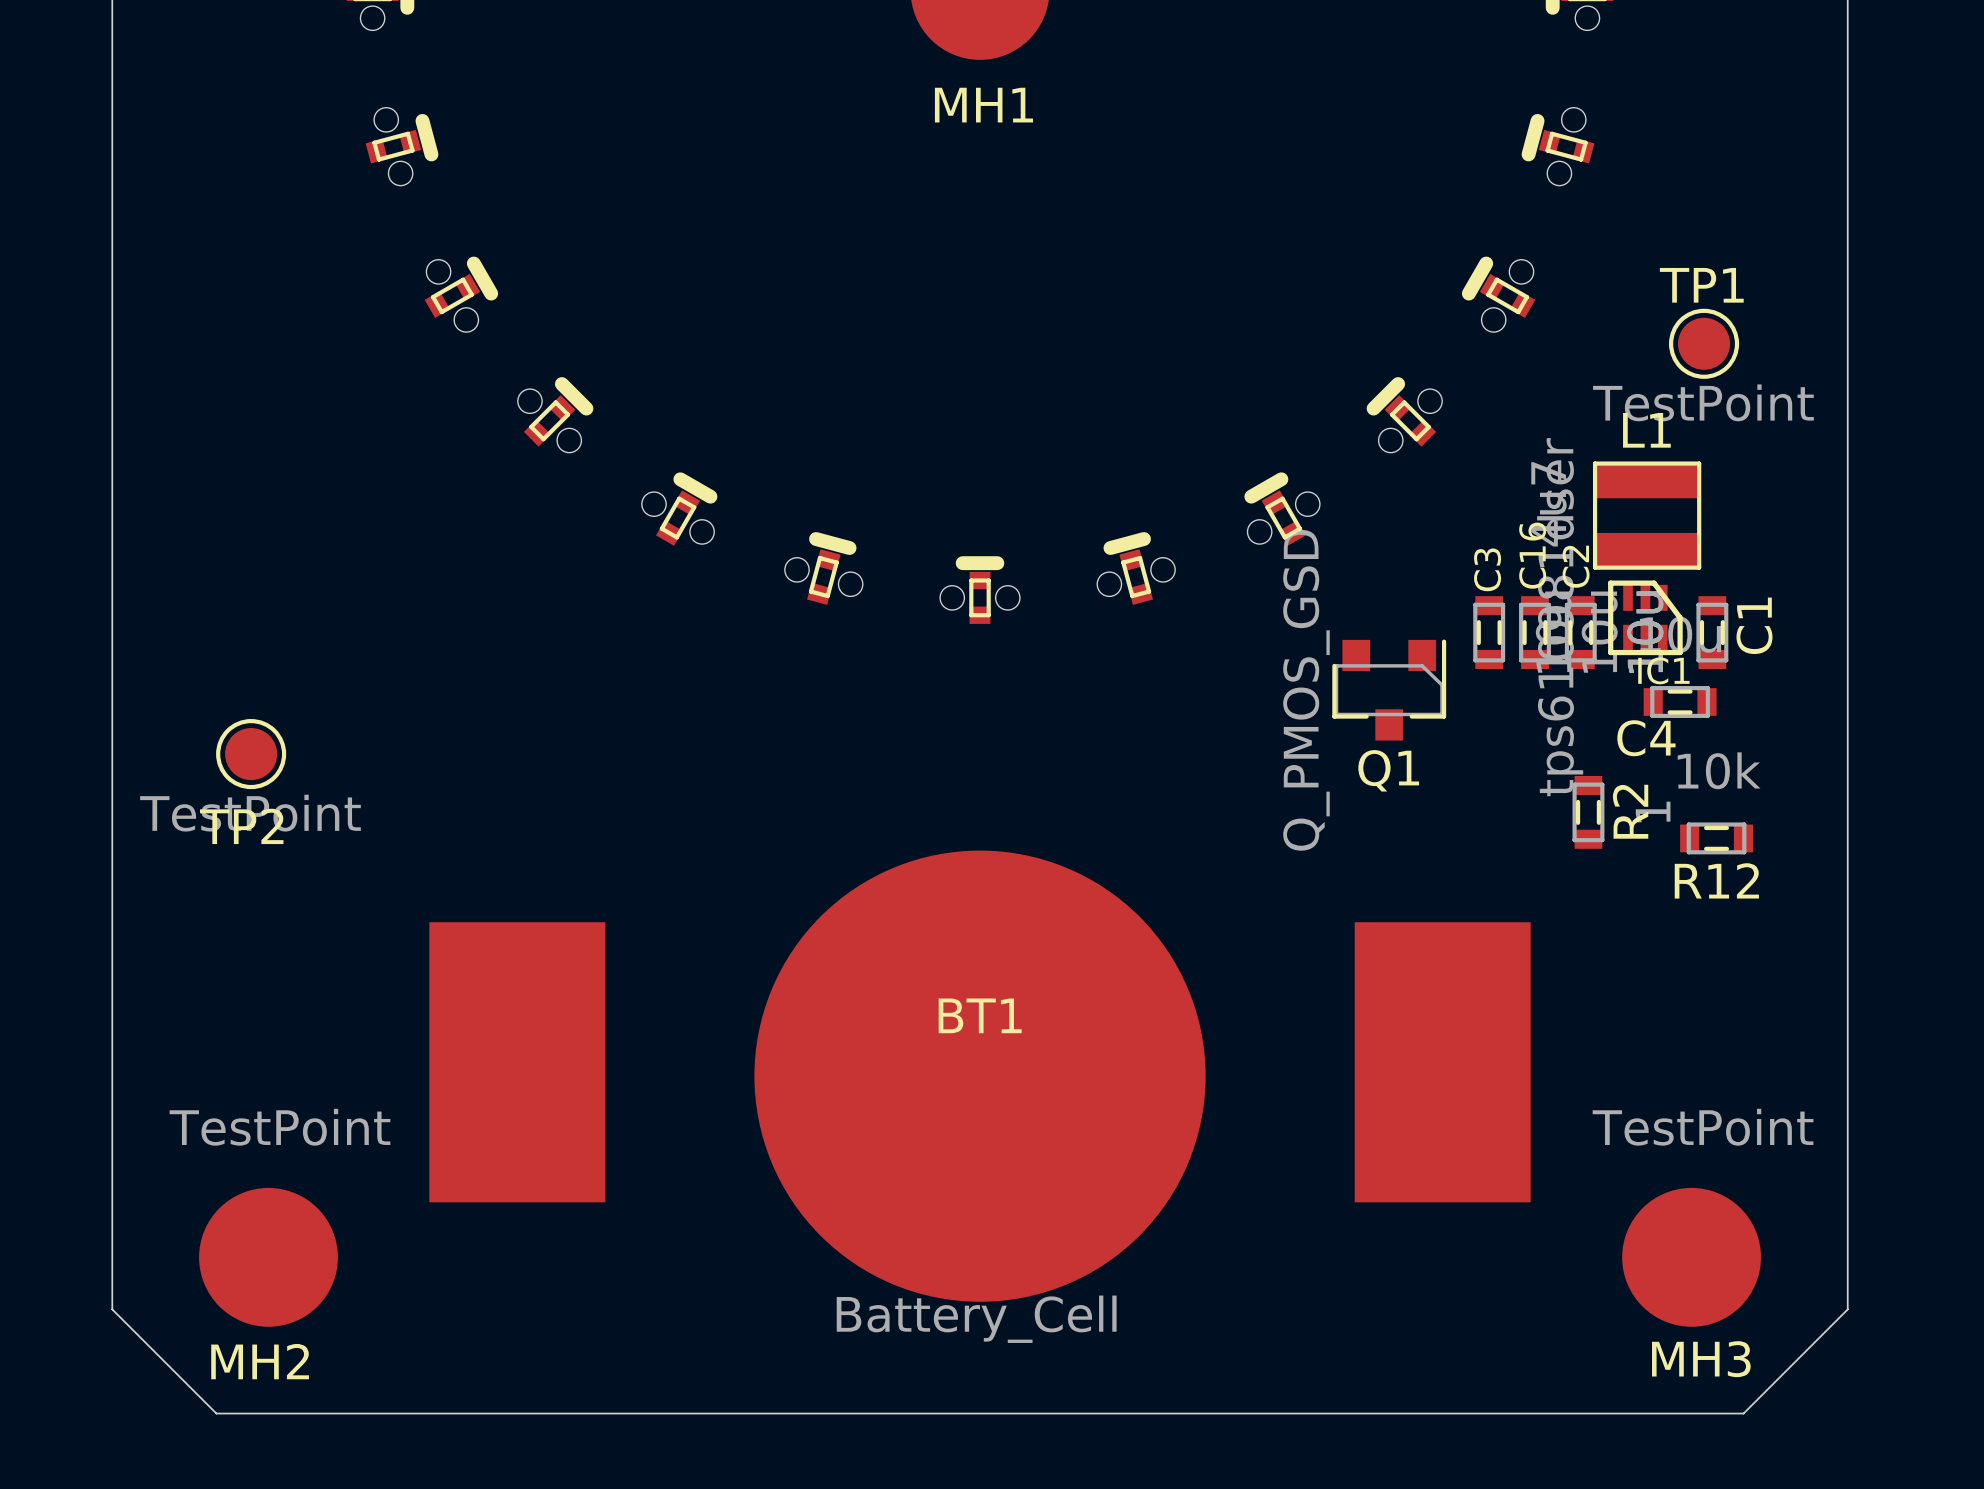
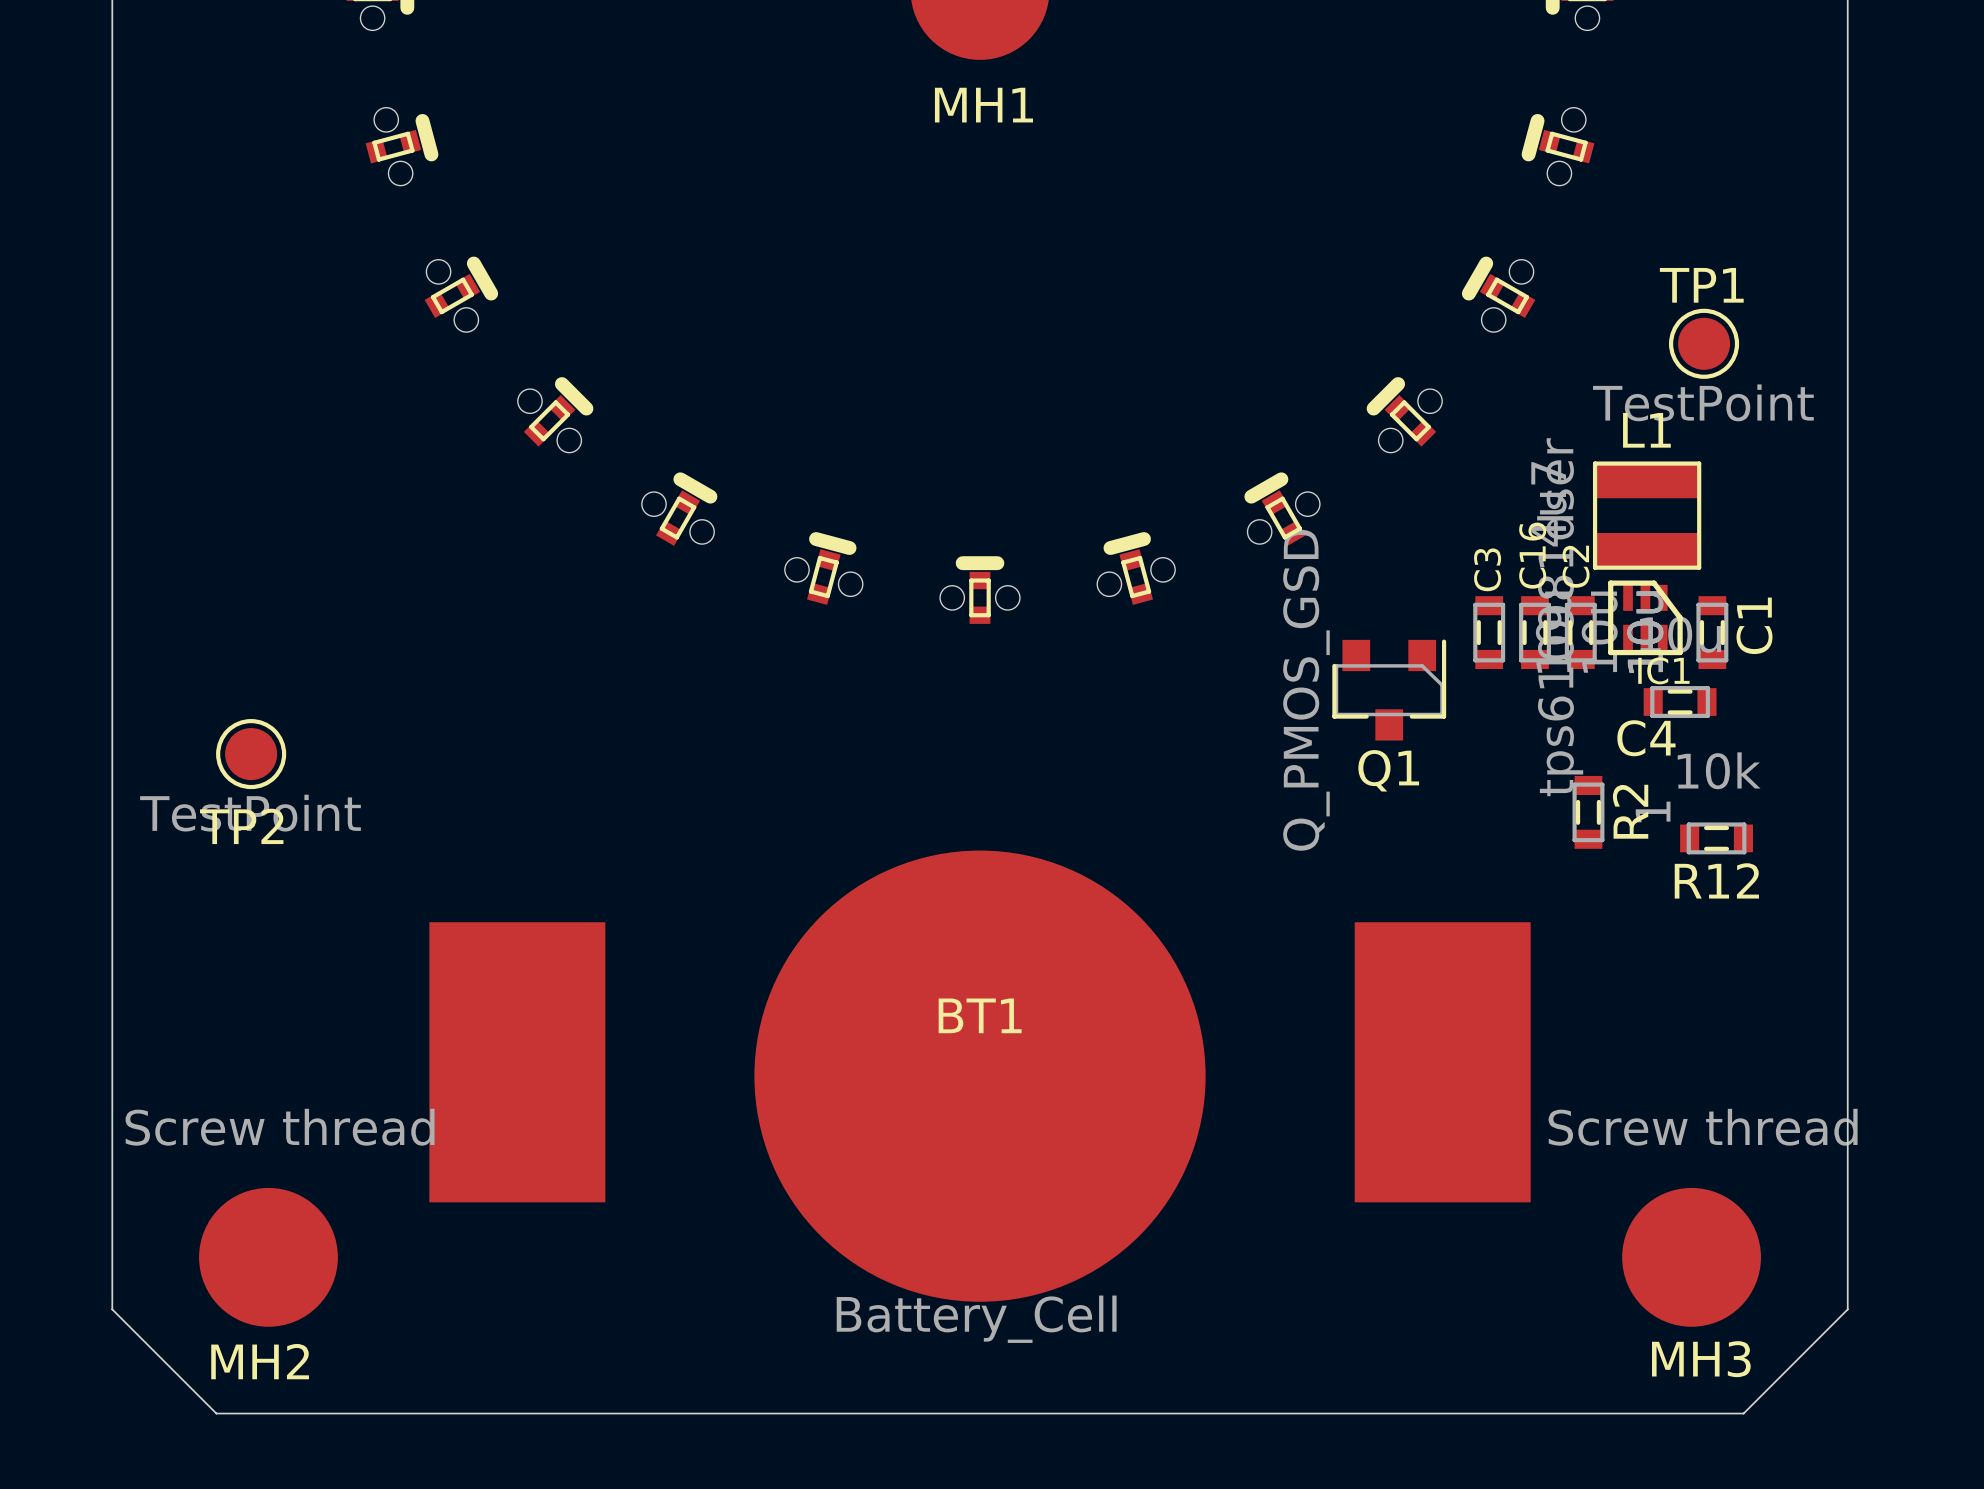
MH2 value: TestPoint (279, 1127) -> Screw thread (280, 1127)
MH3 value: TestPoint (1703, 1127) -> Screw thread (1703, 1127)

